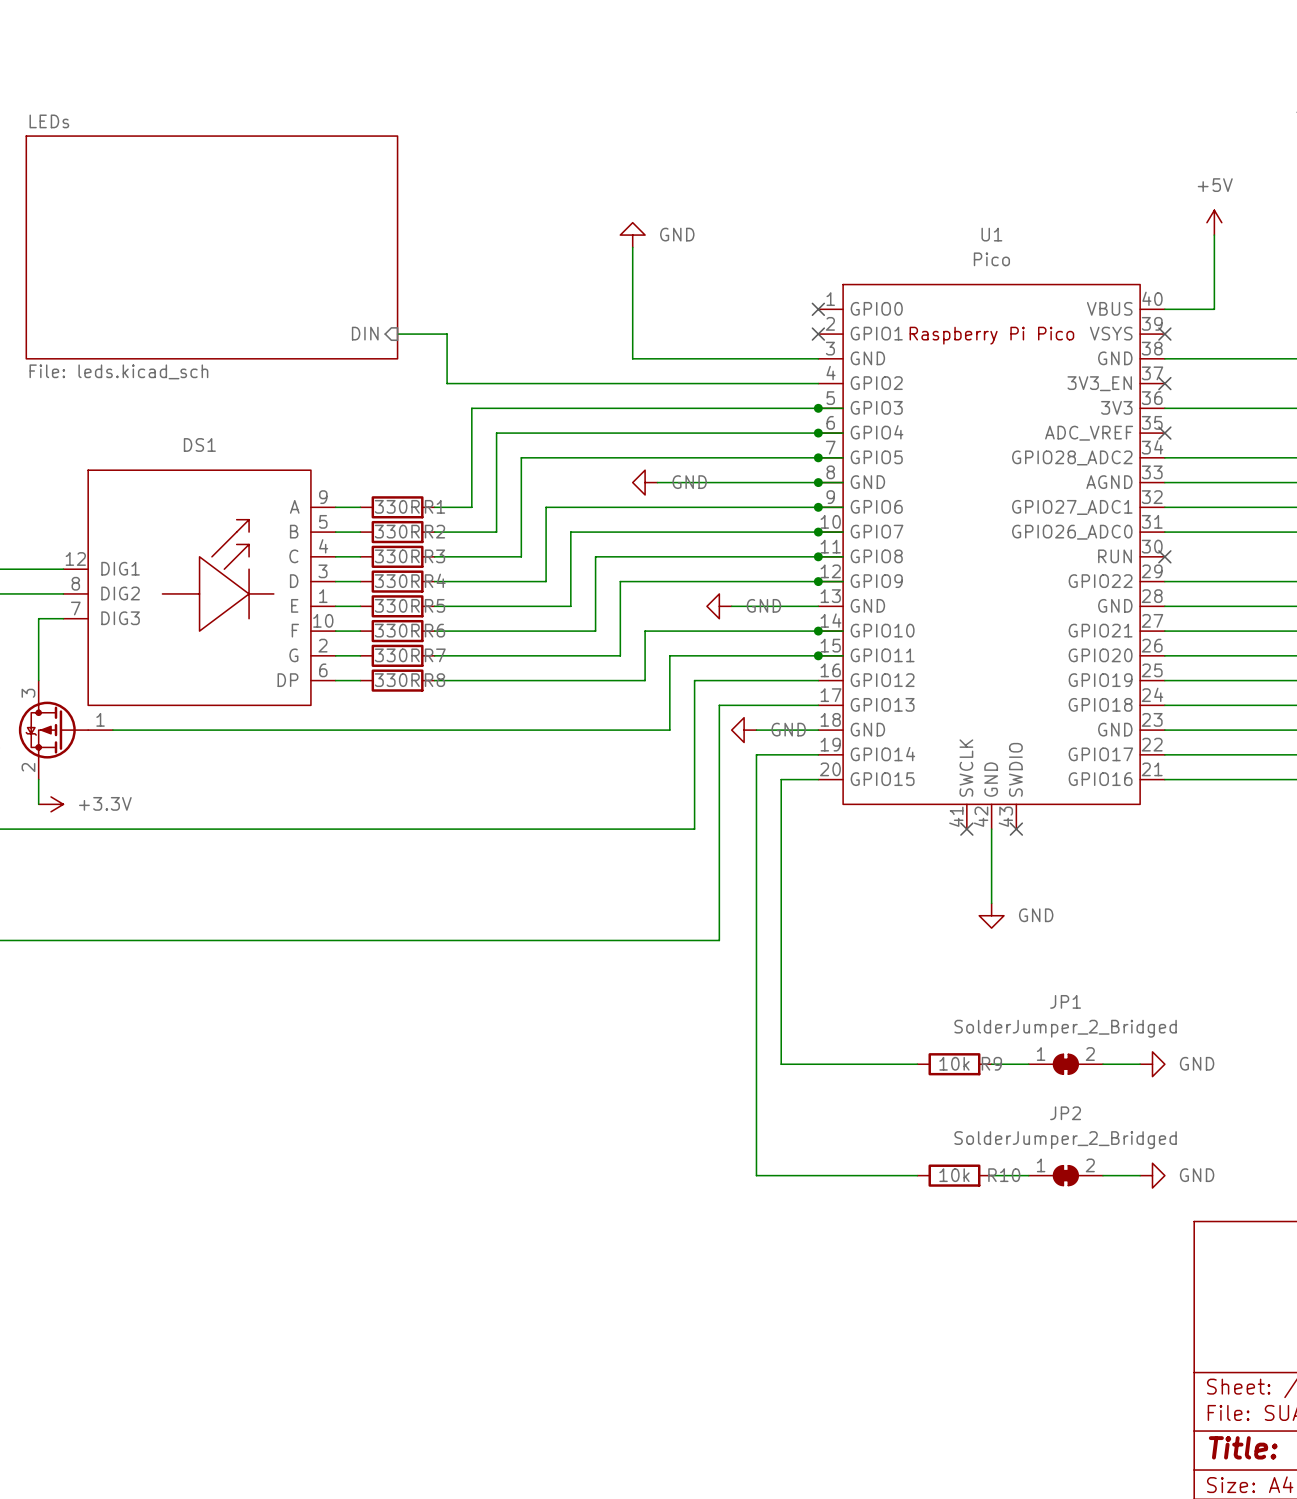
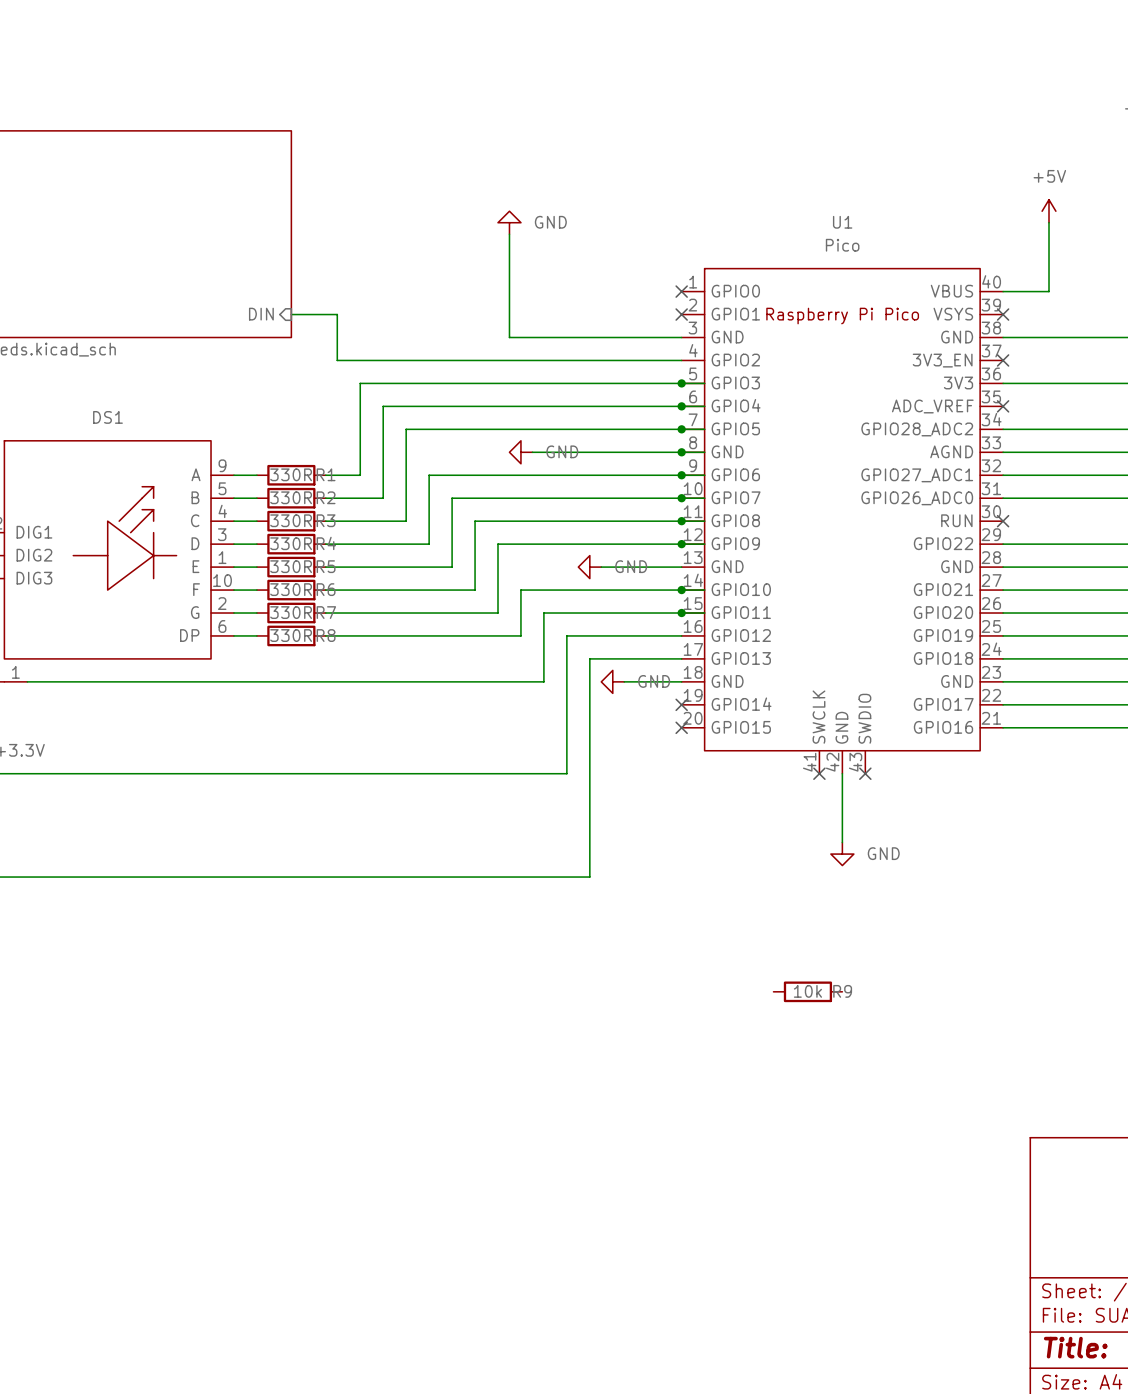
wire: (818, 754) (756, 754) (756, 1175) (917, 1175) -> none
no-connect mark: none -> (681, 704)
wire: (818, 779) (781, 779) (781, 1064) (917, 1064) -> none
no-connect mark: none -> (681, 727)
wire: (991, 1064) (1028, 1064) -> none
JP1: SolderJumper_2_Bridged (1065, 1064) -> none
wire: (1102, 1064) (1140, 1064) -> none
power symbol: GND (1152, 1064) -> none
R10: 10k (954, 1175) -> none
wire: (991, 1175) (1028, 1175) -> none
JP2: SolderJumper_2_Bridged (1065, 1175) -> none
wire: (1102, 1175) (1140, 1175) -> none
power symbol: GND (1152, 1175) -> none

